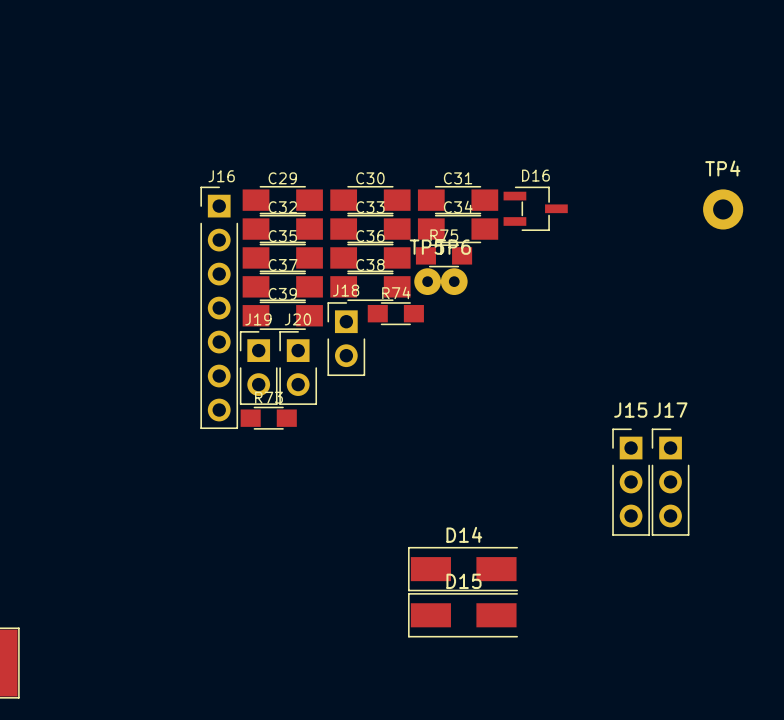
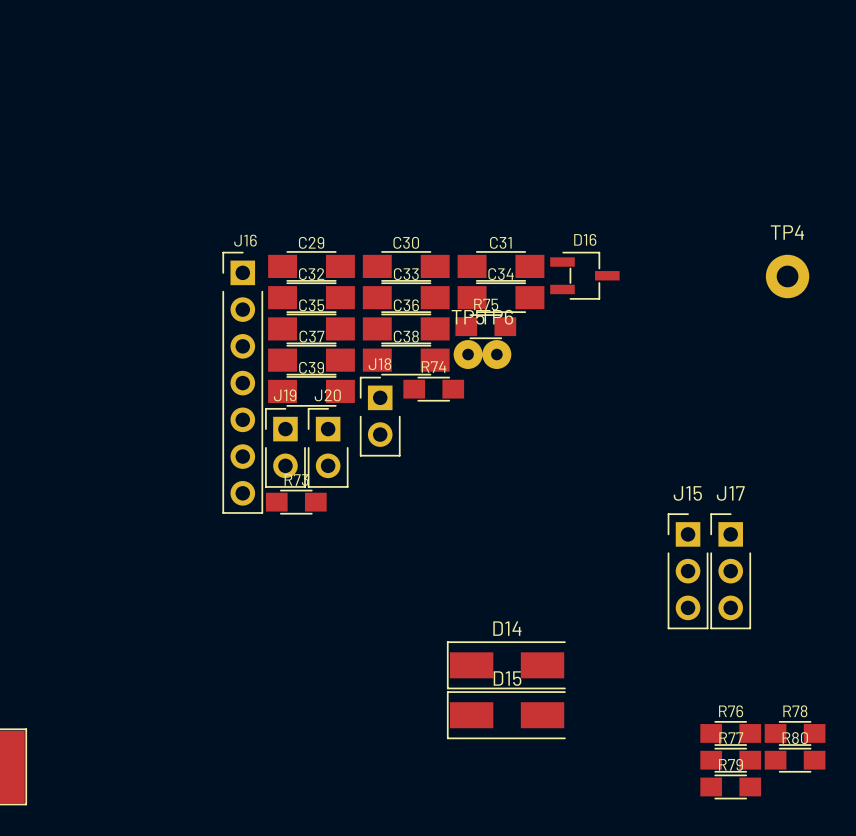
R76: none -> (730, 733)
R78: none -> (795, 733)
R77: none -> (730, 760)
R80: none -> (795, 760)
R79: none -> (730, 786)

